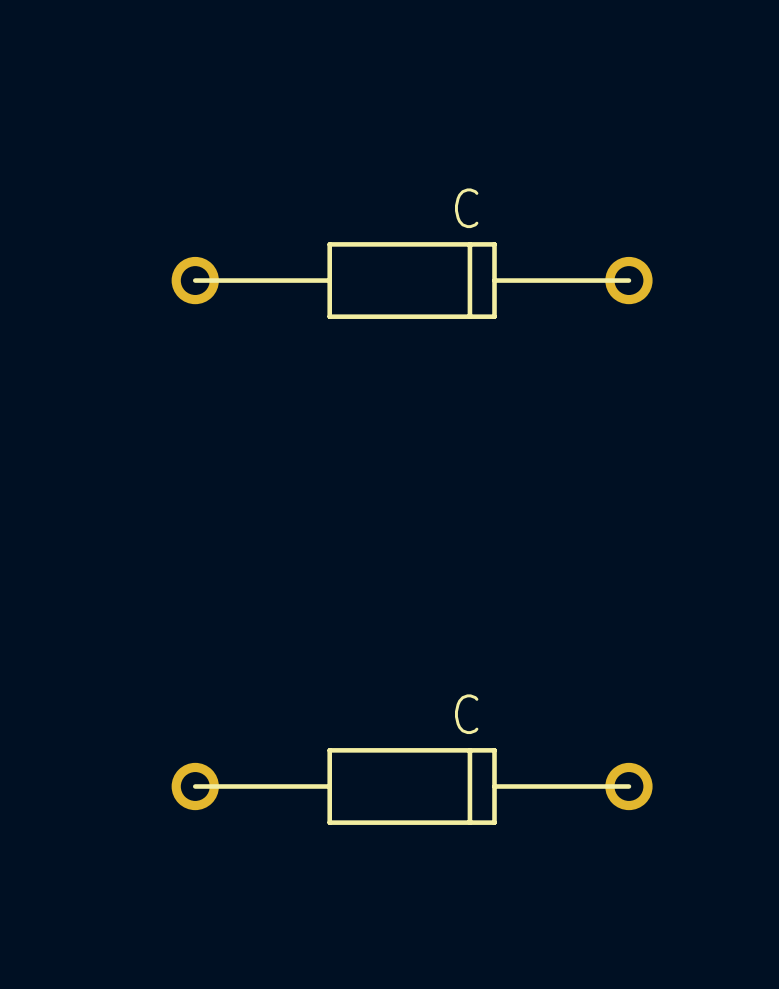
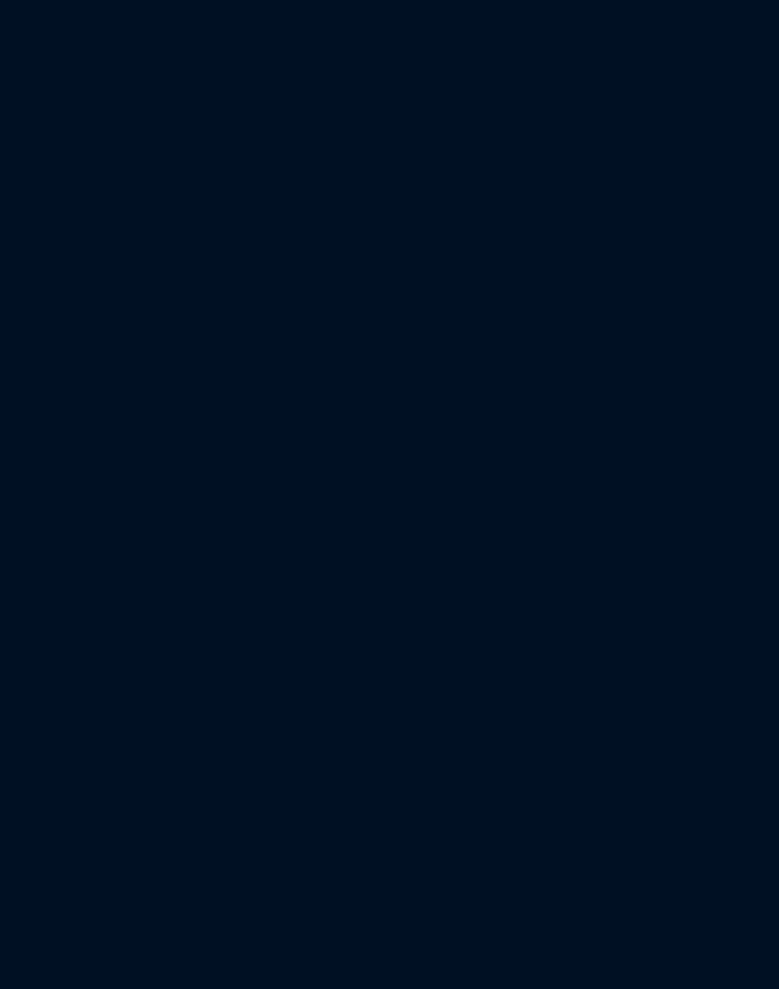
part: (412, 280) -> none
part: (412, 786) -> none

